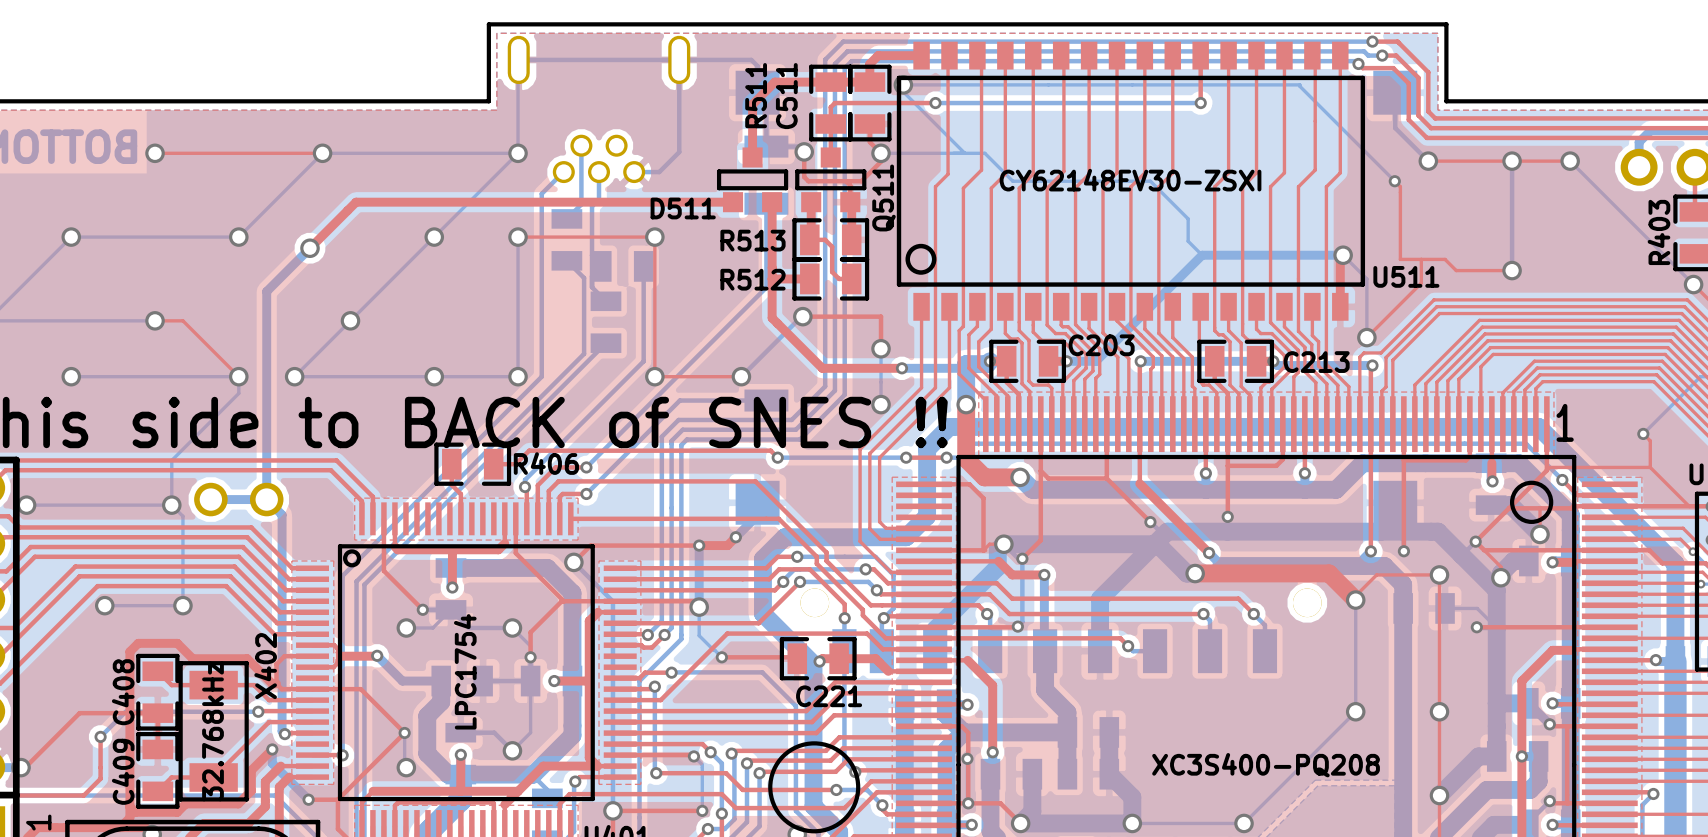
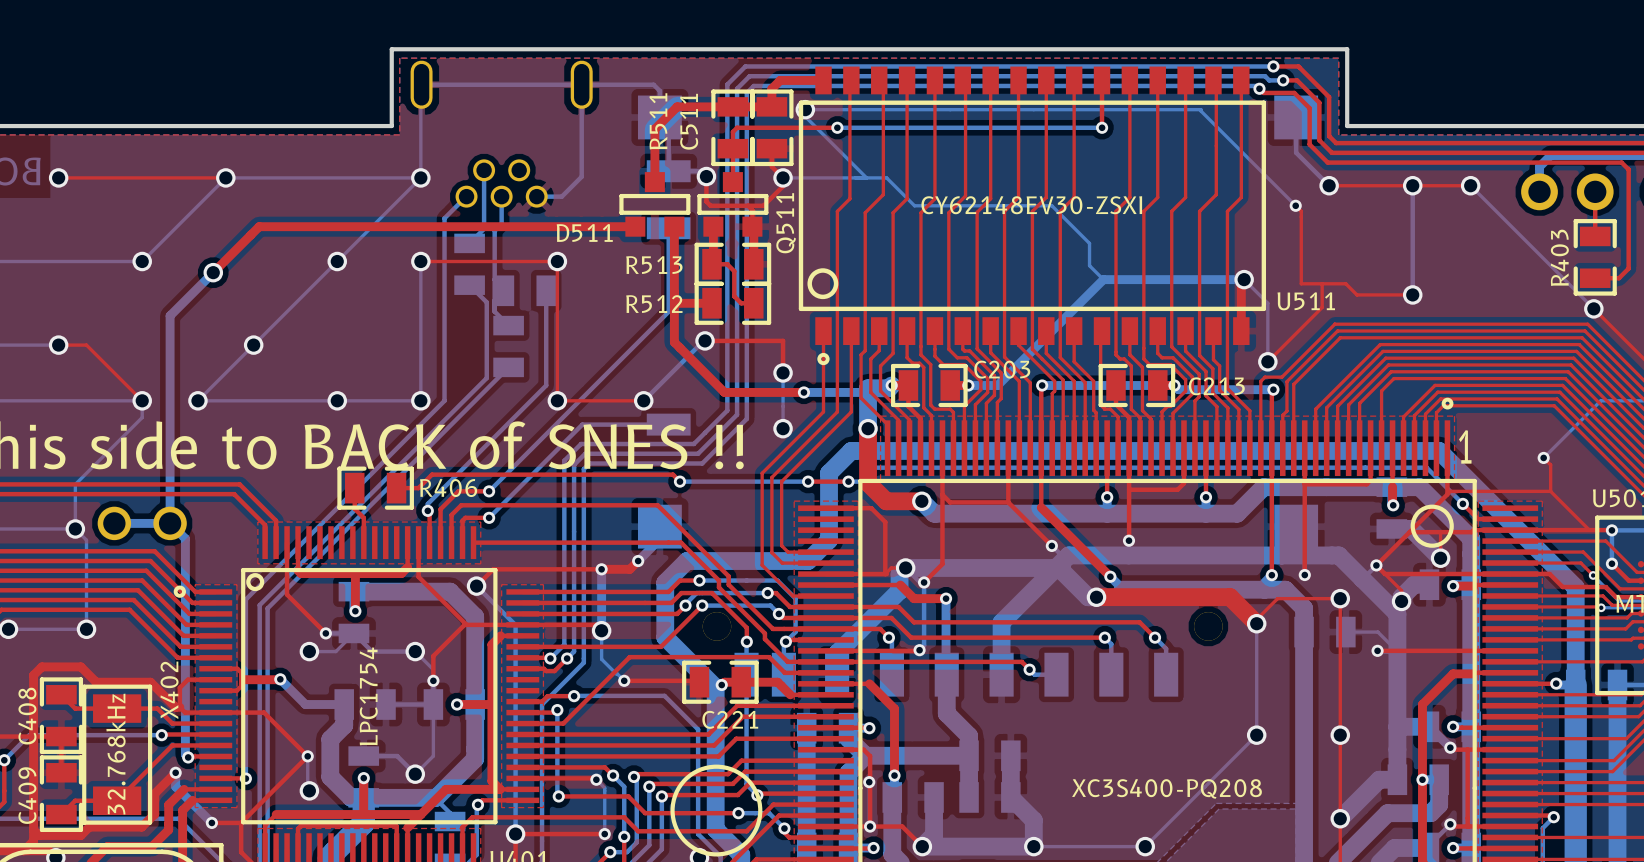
drawing: none -> [817, 352, 830, 366]
drawing: none -> [1441, 397, 1454, 410]
drawing: none -> [173, 585, 186, 598]

